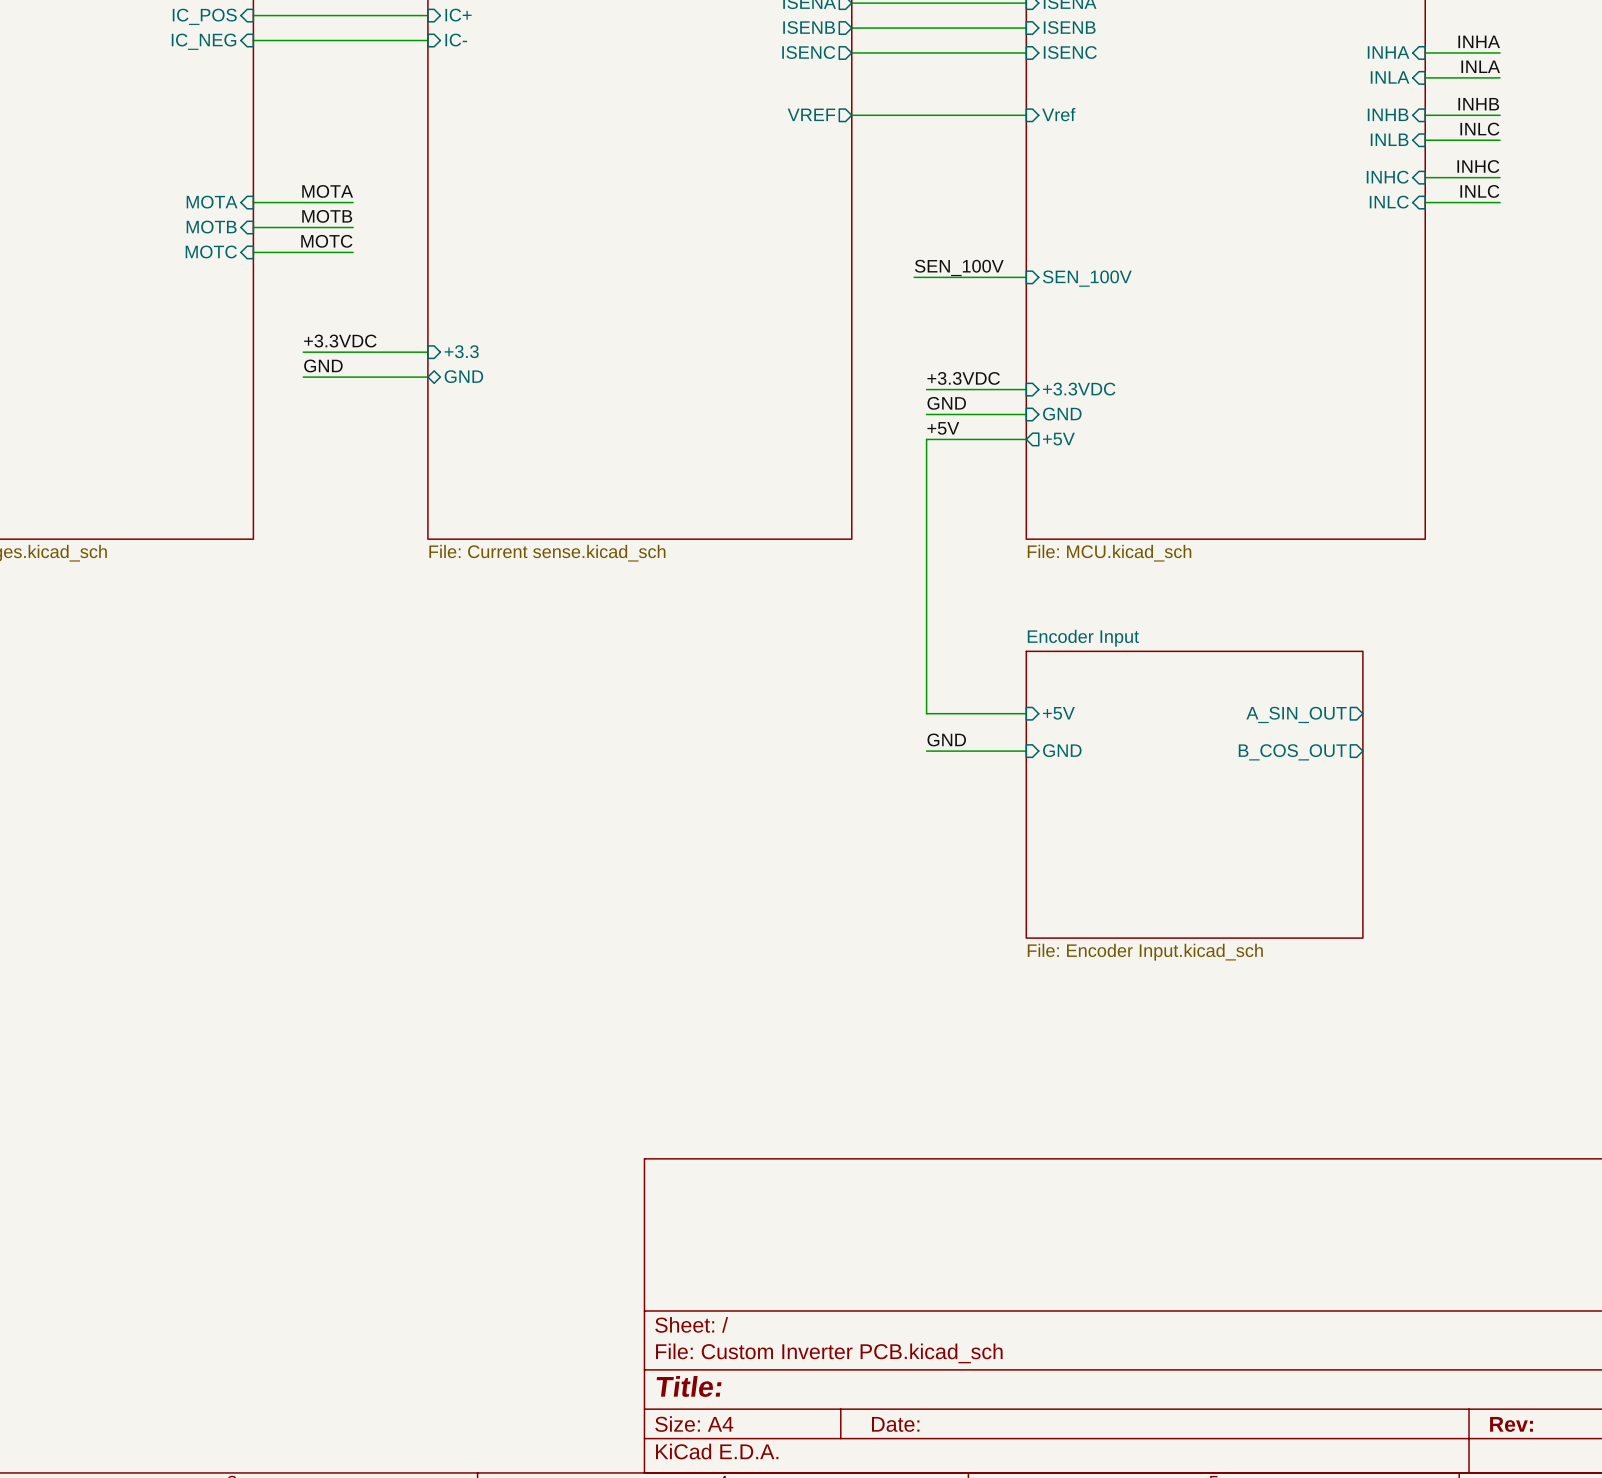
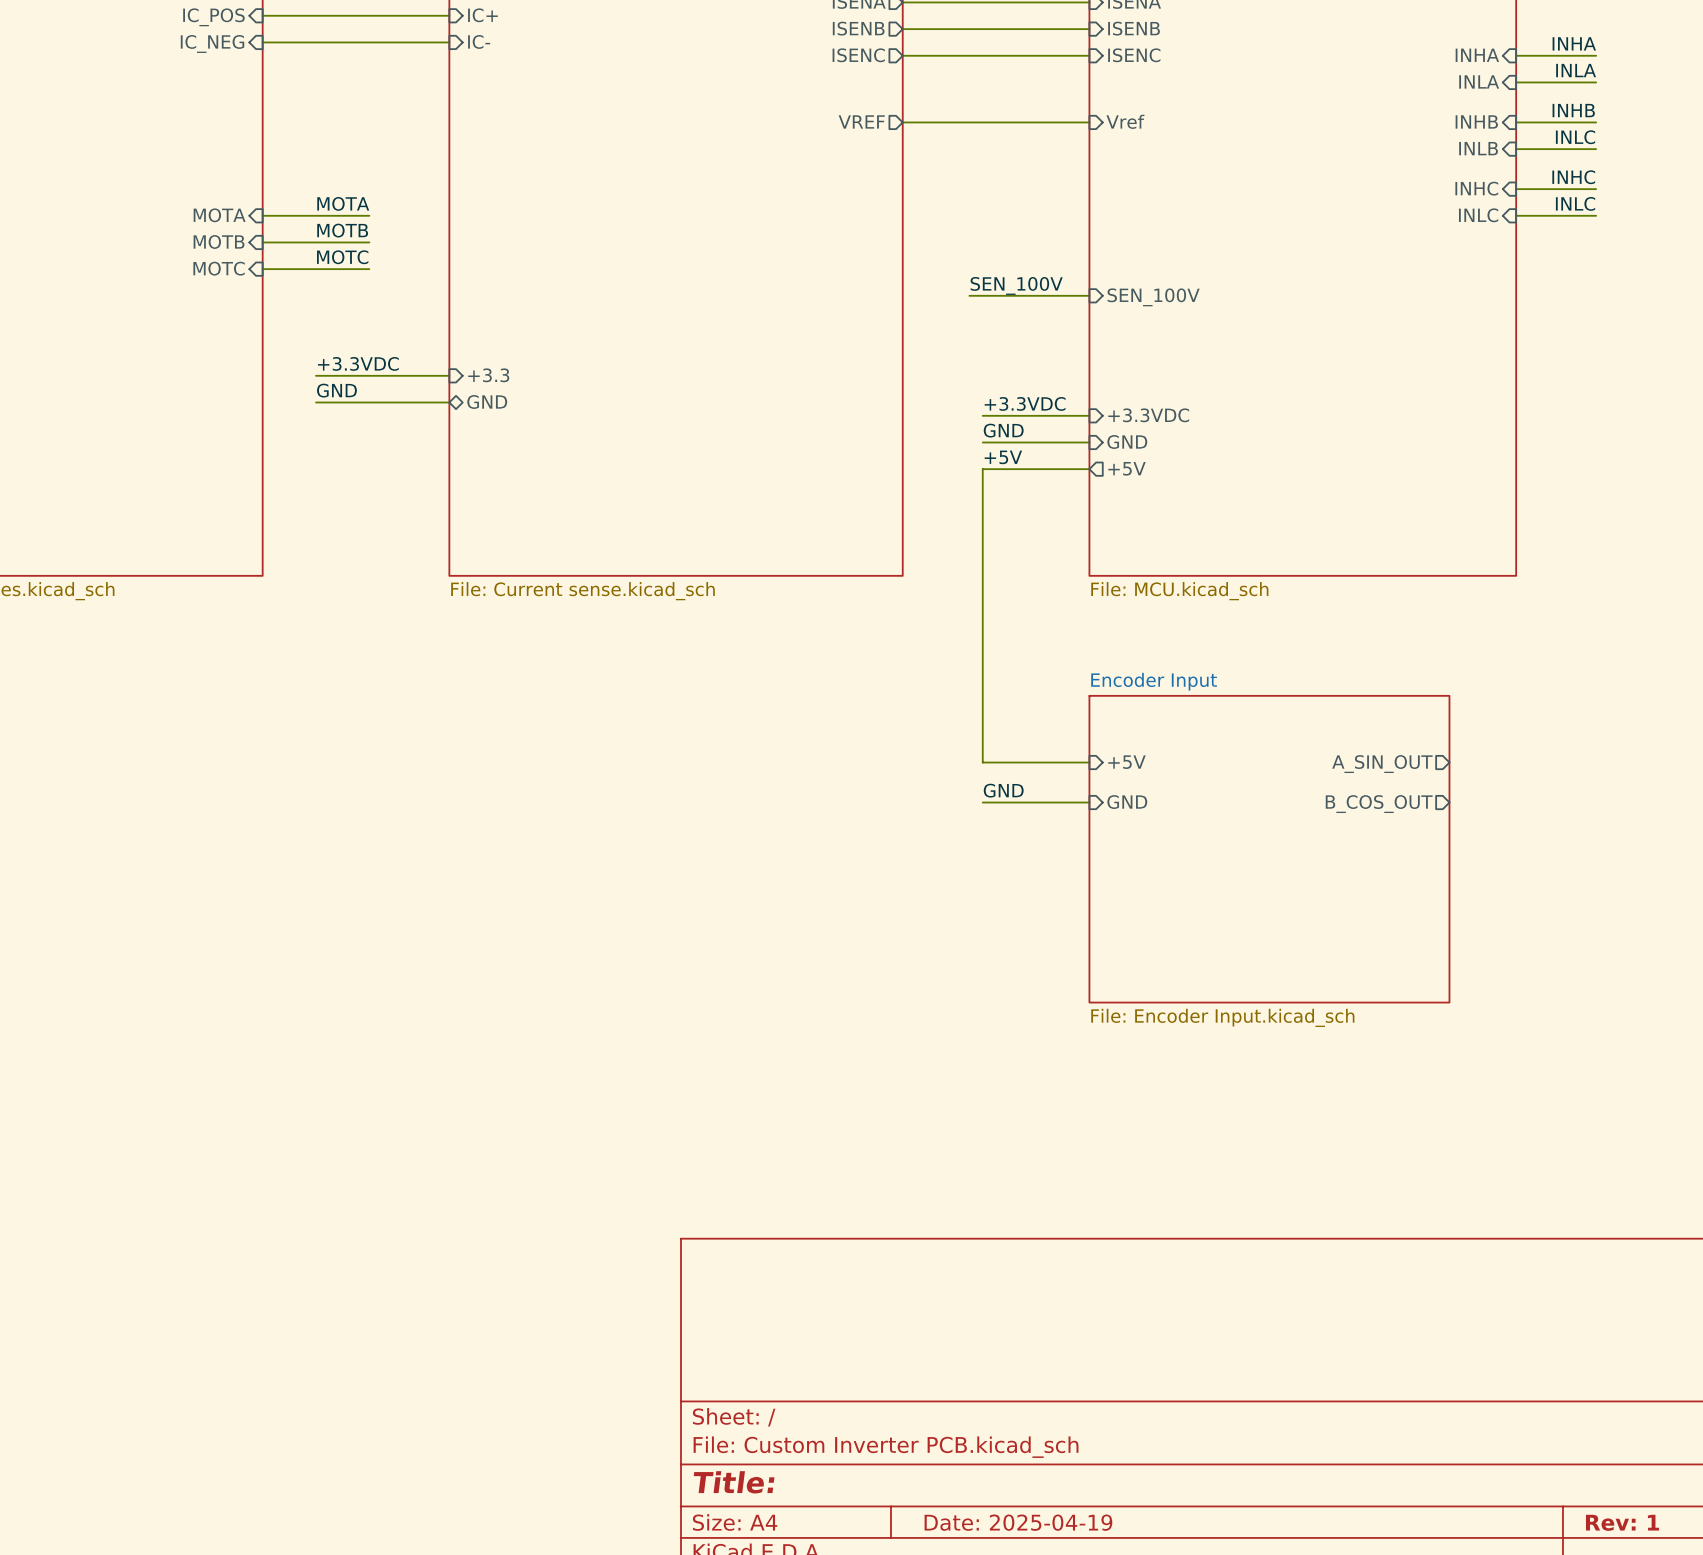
title block: Date: (895, 1424) -> Date: 2025-04-19 (1018, 1522)
title block: Rev: (1511, 1424) -> Rev: 1 (1622, 1522)

